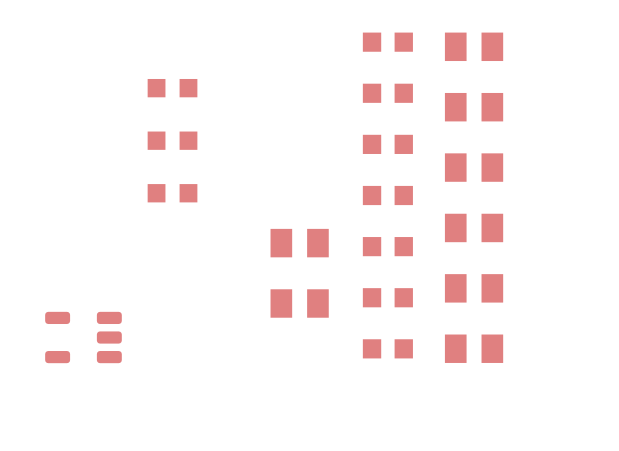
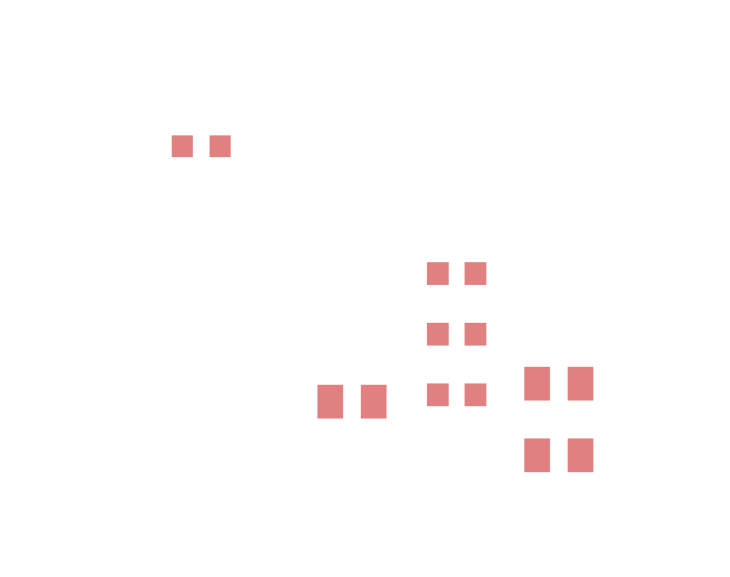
part: (387, 42) -> none
part: (474, 46) -> none
part: (387, 93) -> none
part: (474, 107) -> none
part: (172, 140) -> none
part: (387, 144) -> none
part: (474, 167) -> none
part: (172, 193) -> none
part: (474, 227) -> none
part: (299, 243) -> none
part: (83, 337) -> none
part: (387, 348) -> none

